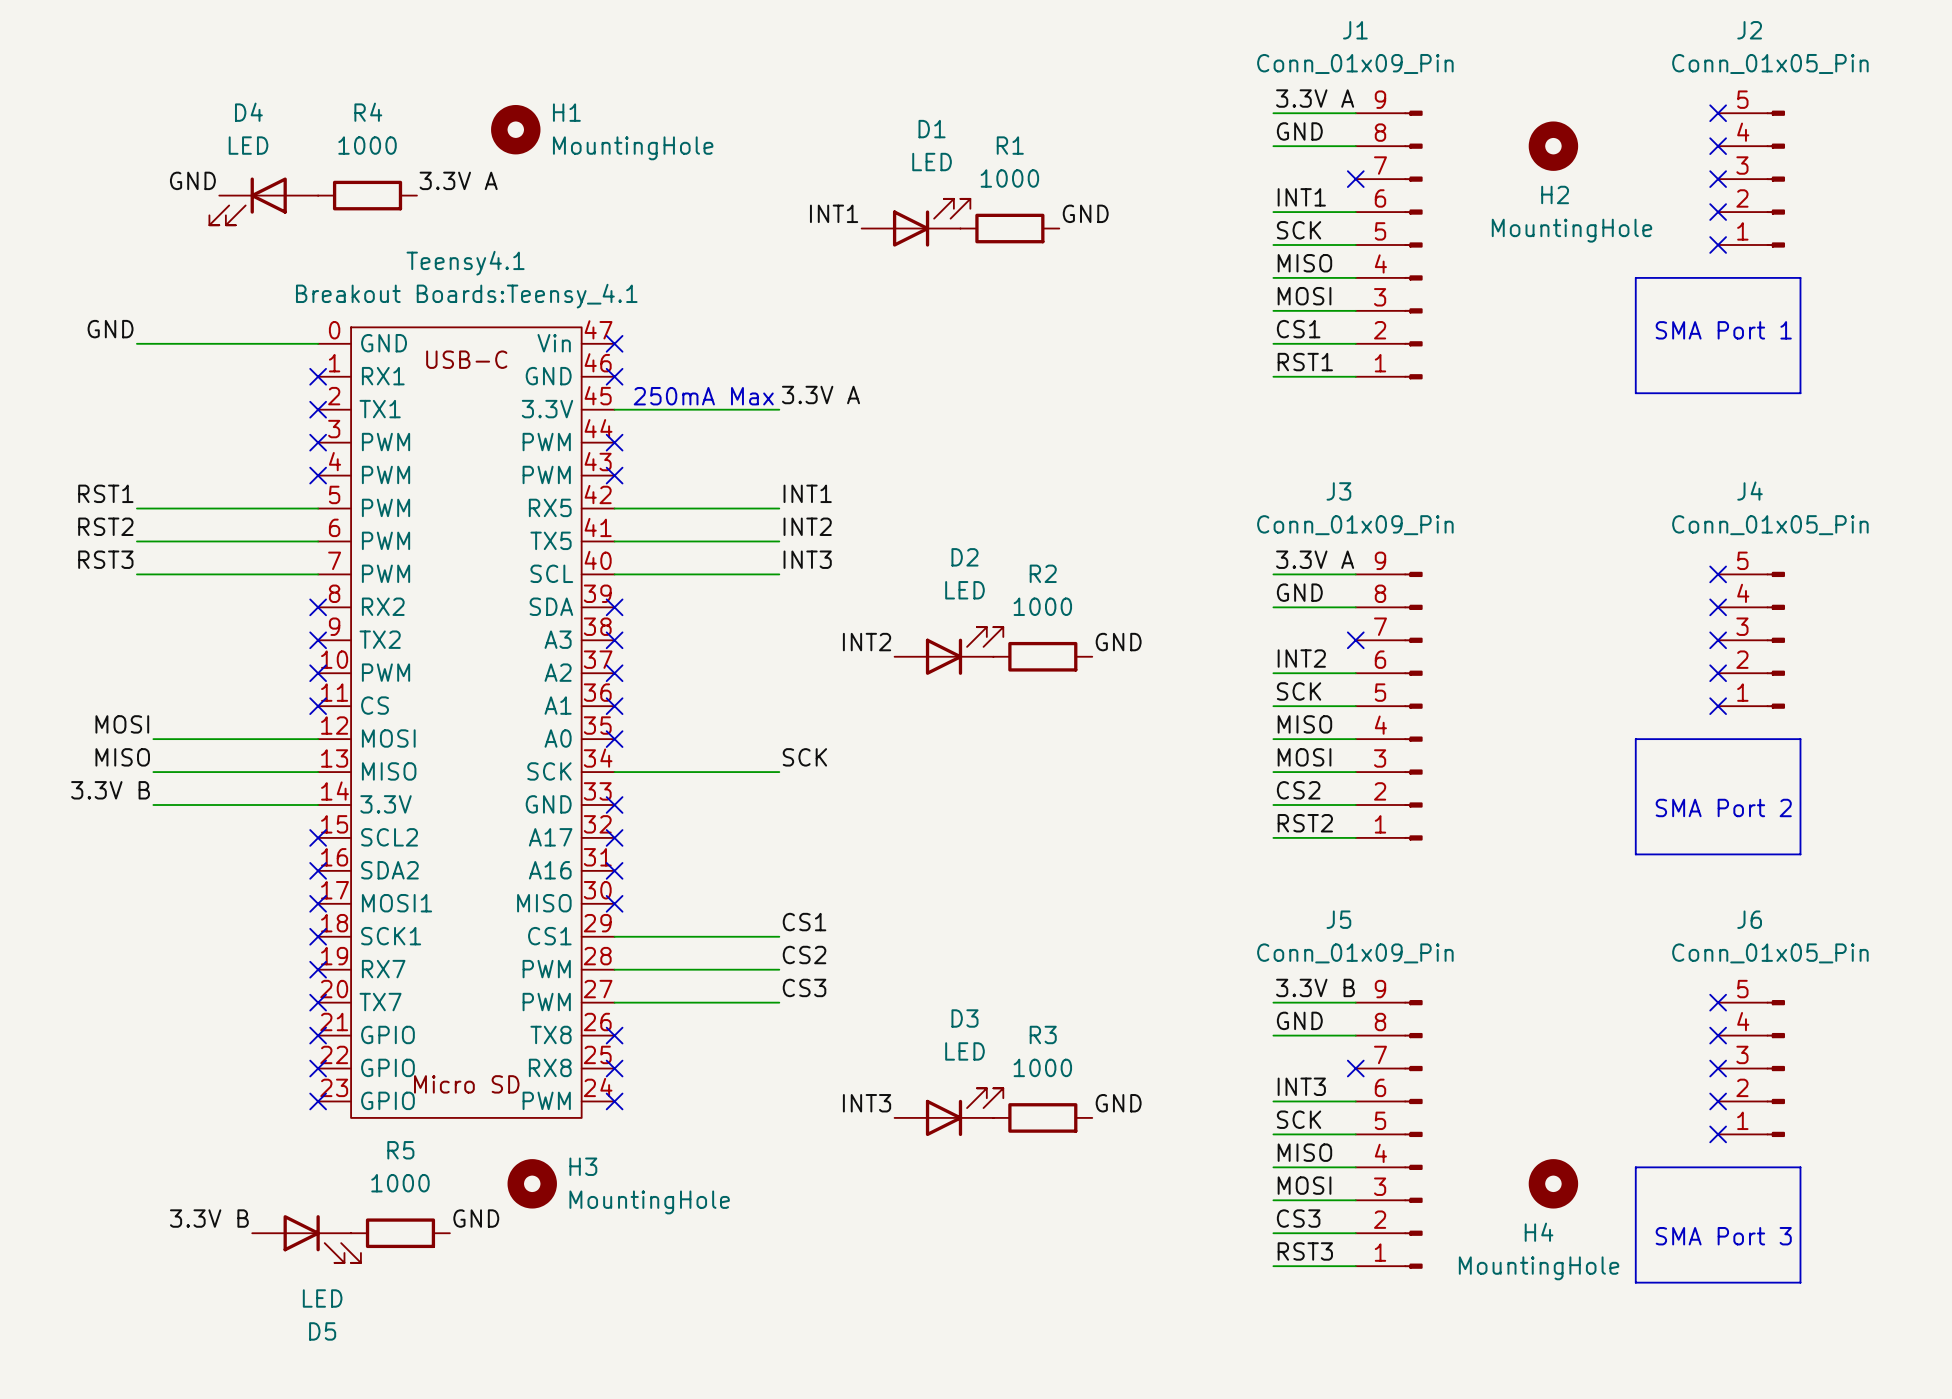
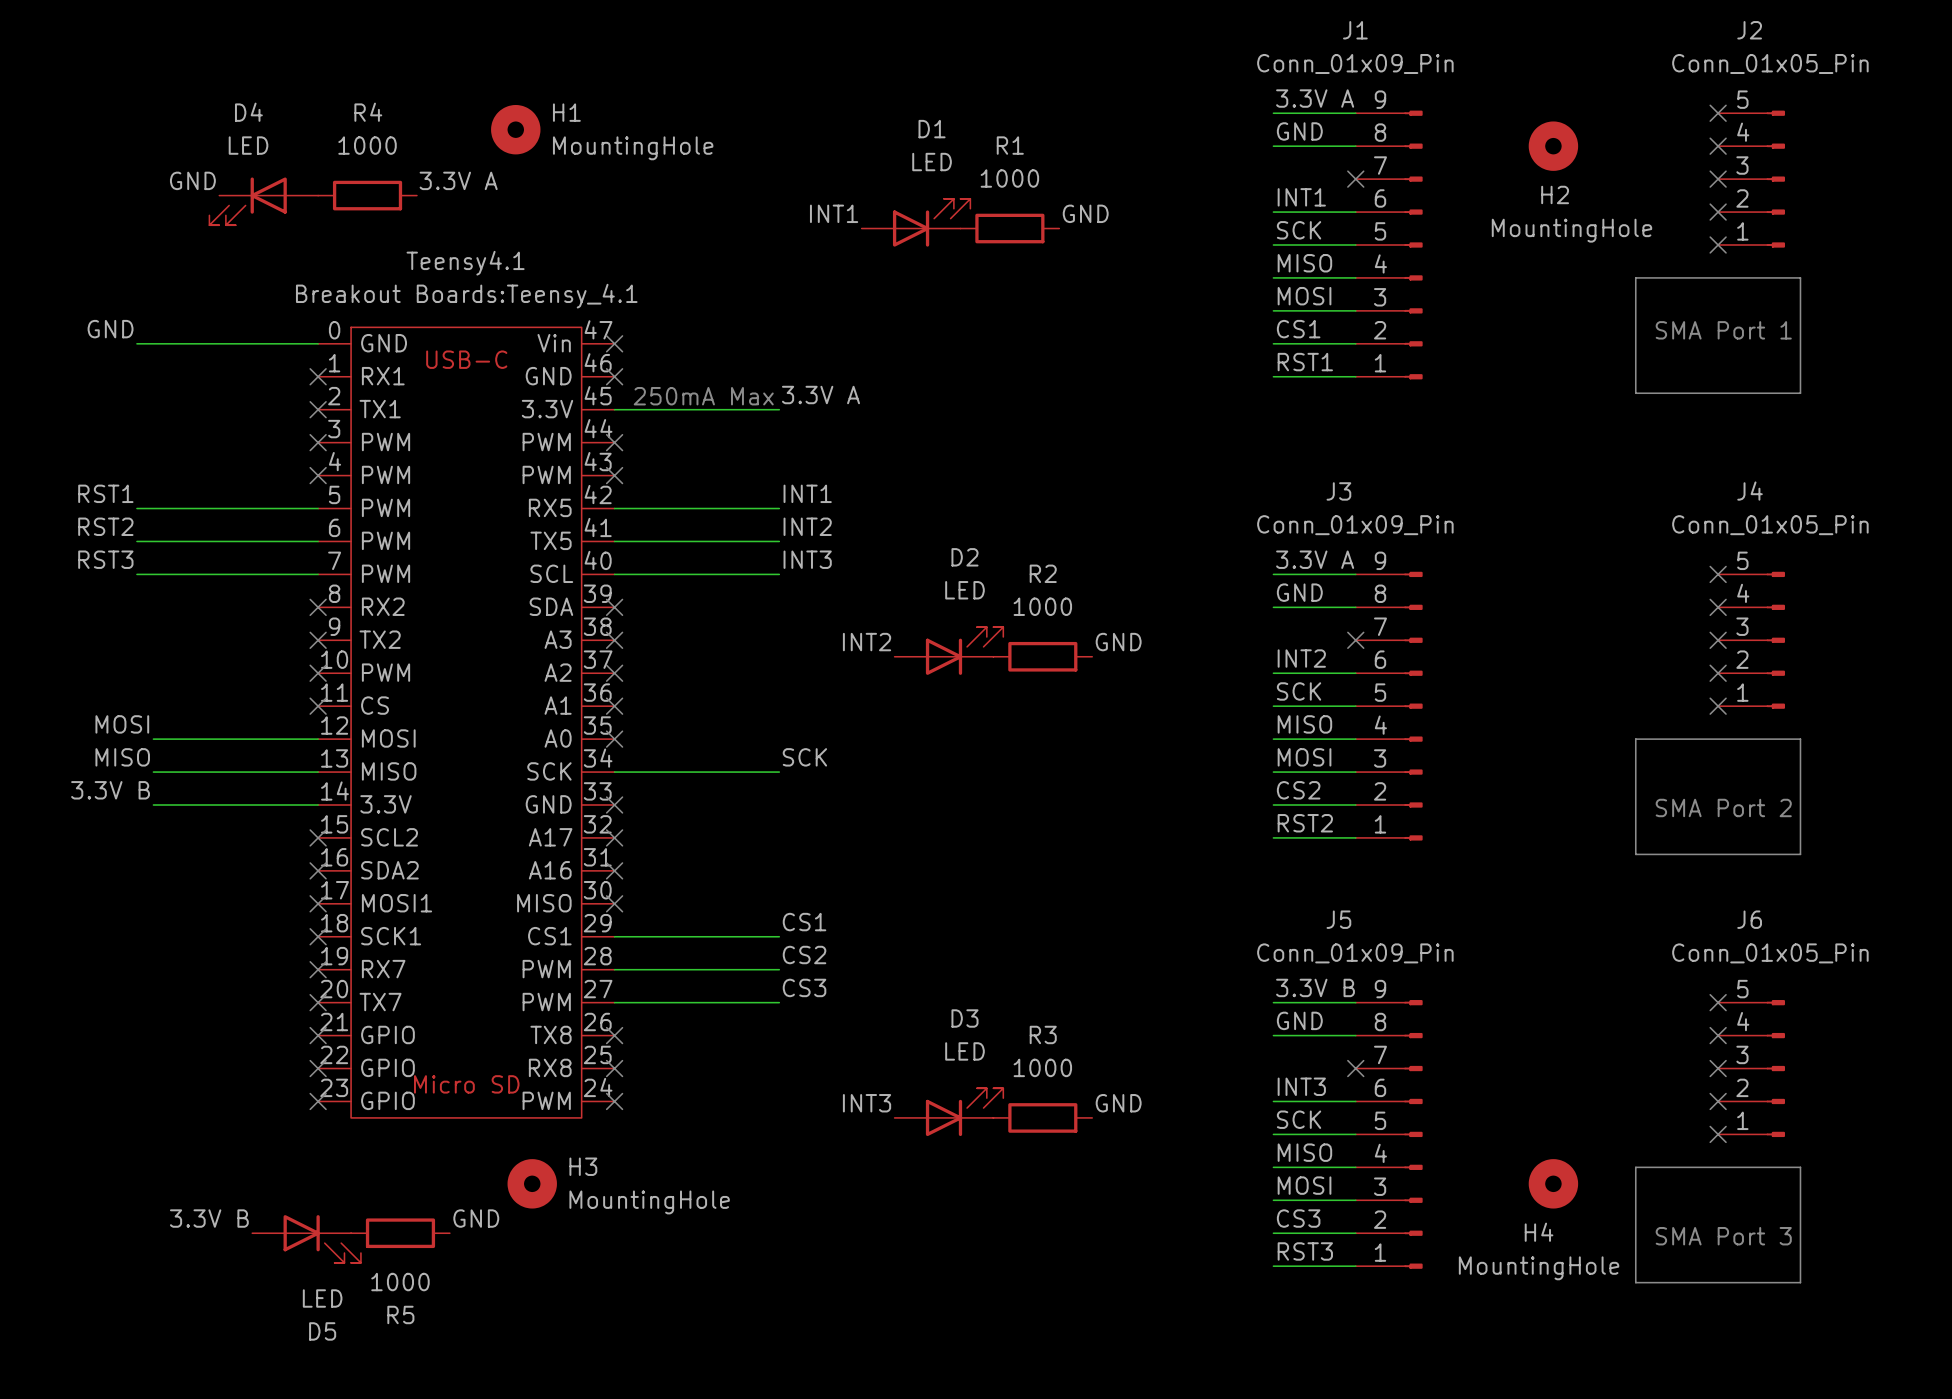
R5 name position: R5 (400, 1150) -> R5 (400, 1314)
R5 value position: 1000 (400, 1183) -> 1000 (400, 1282)

